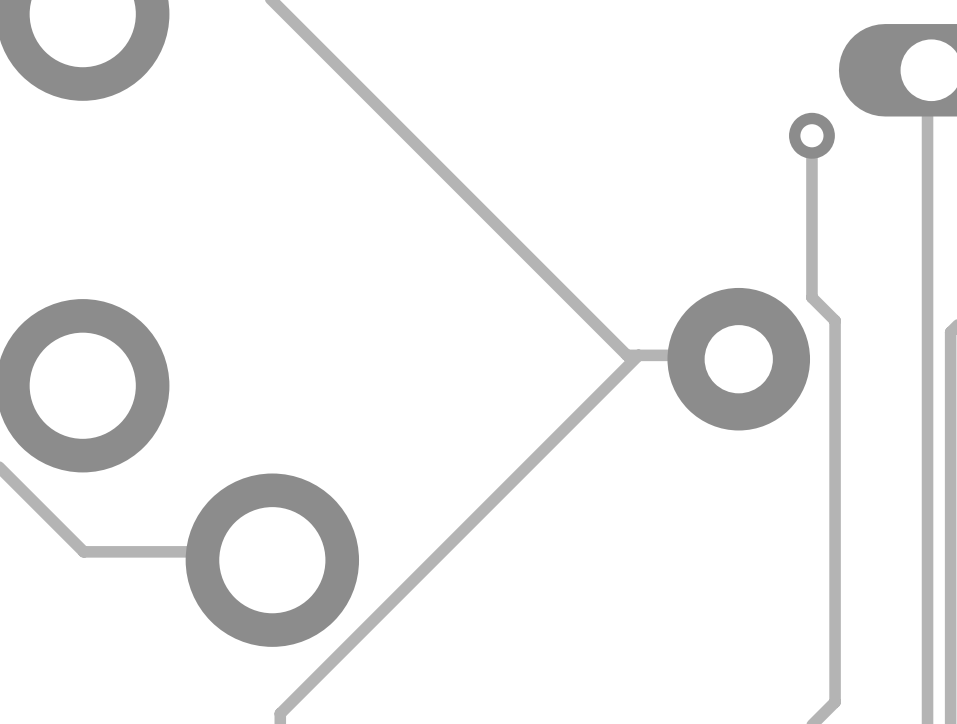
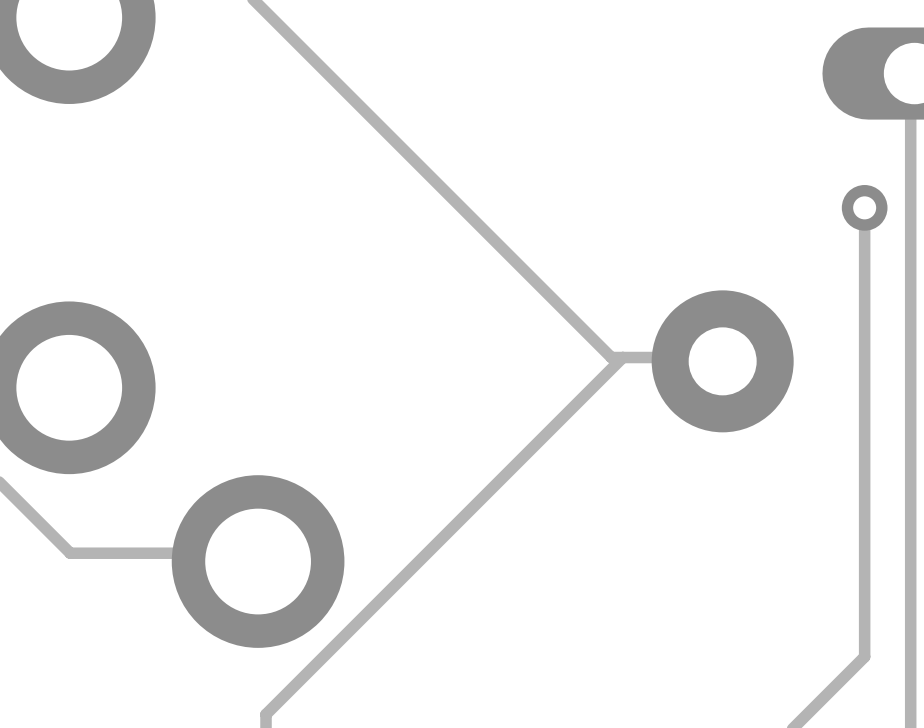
track: (811, 135) (811, 297) (835, 320) (835, 702) -> (864, 207) (864, 656) (818, 702)
via position: (811, 135) -> (864, 207)

